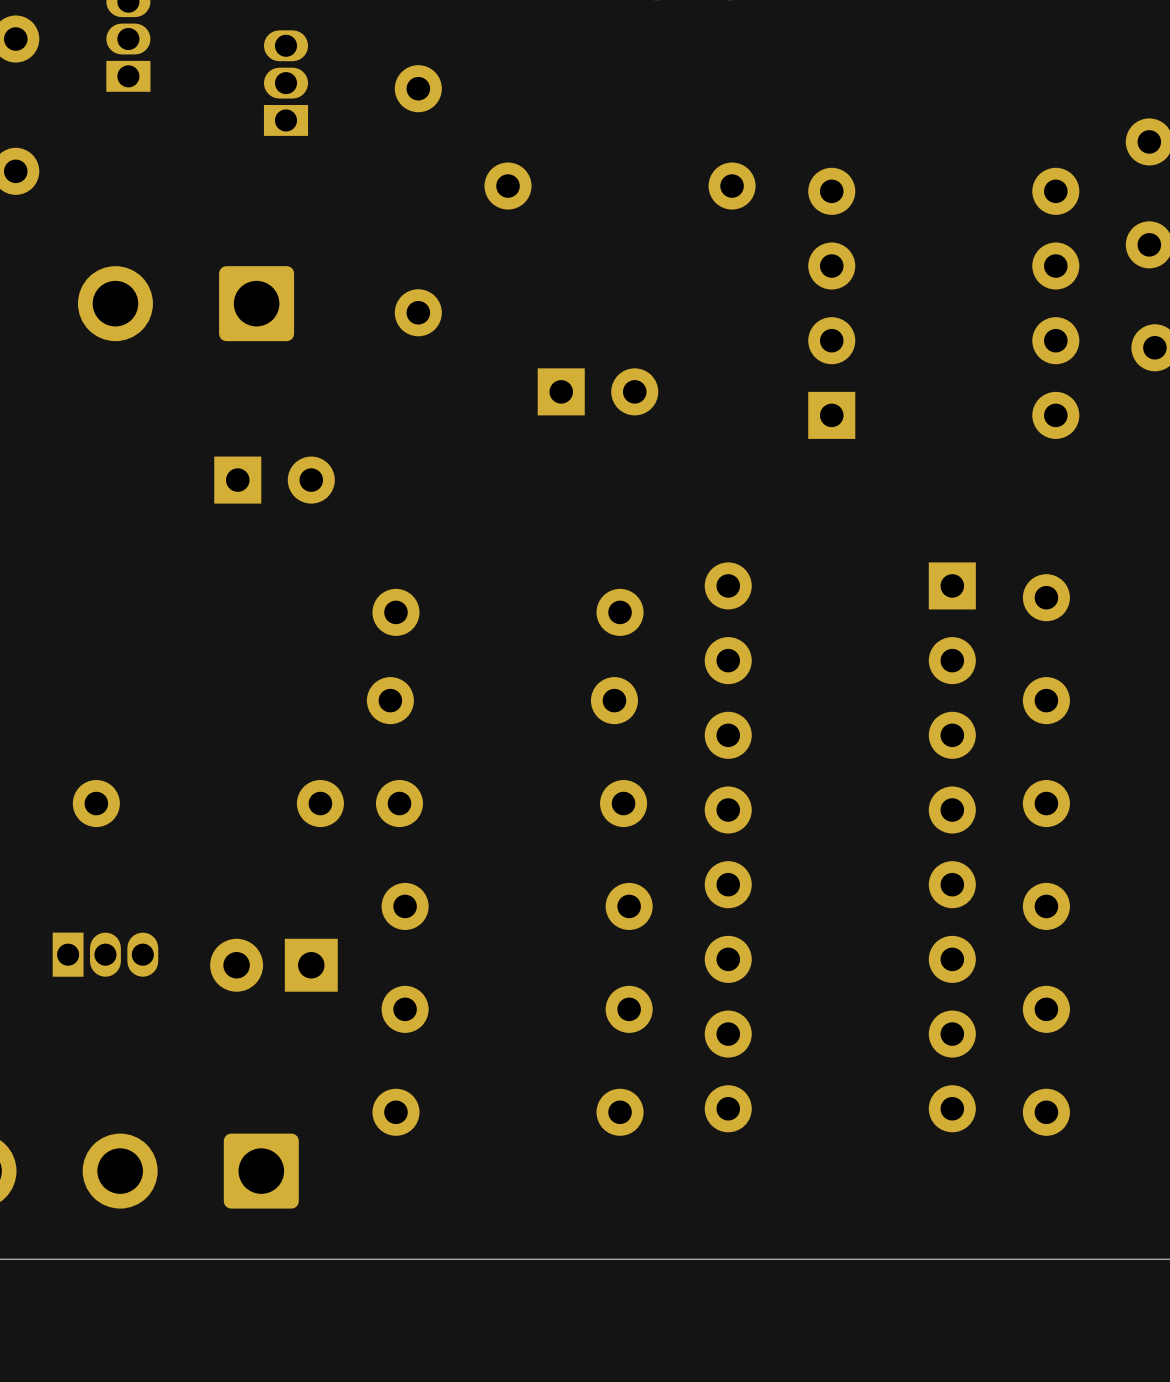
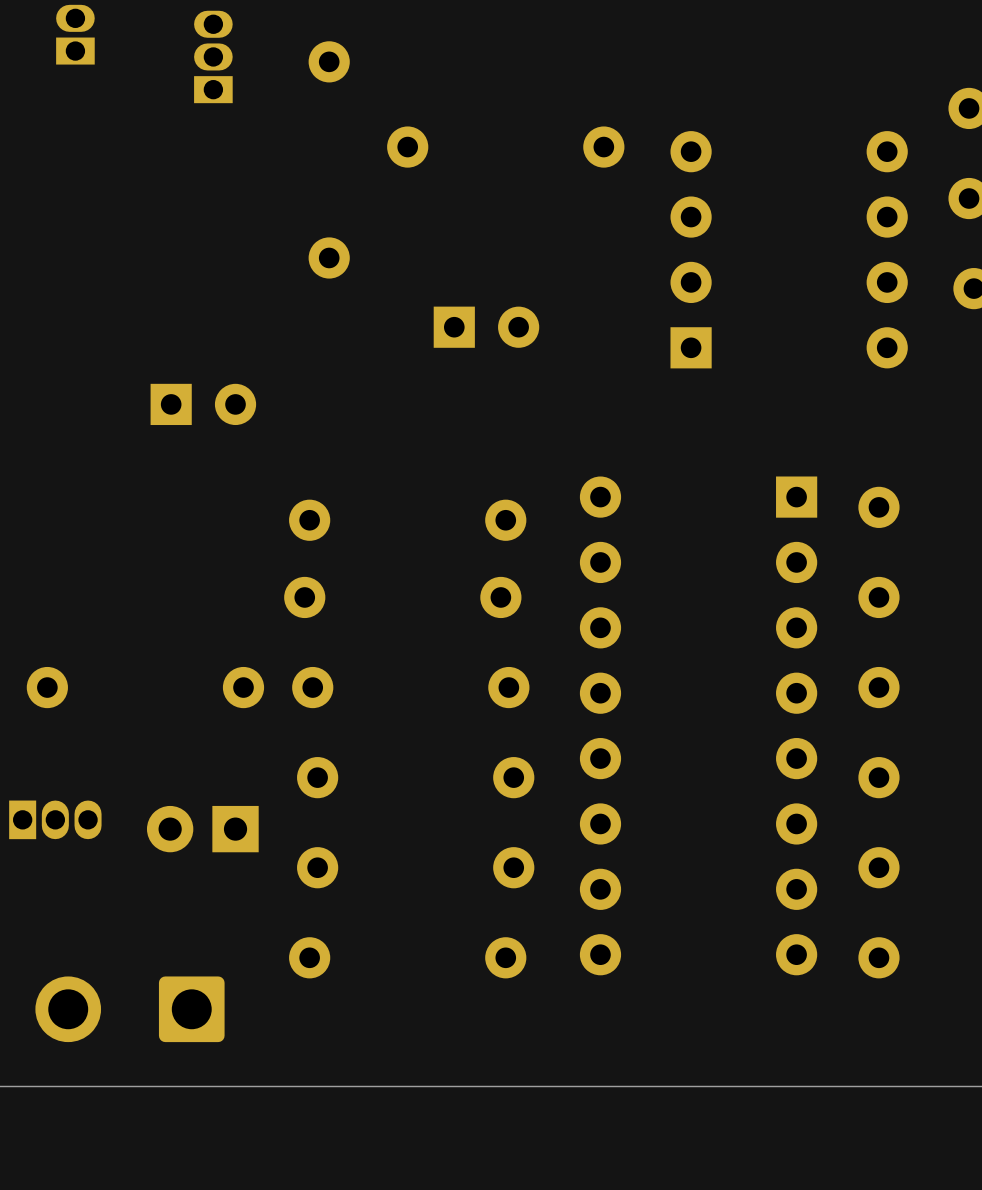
part: (186, 303) -> none

